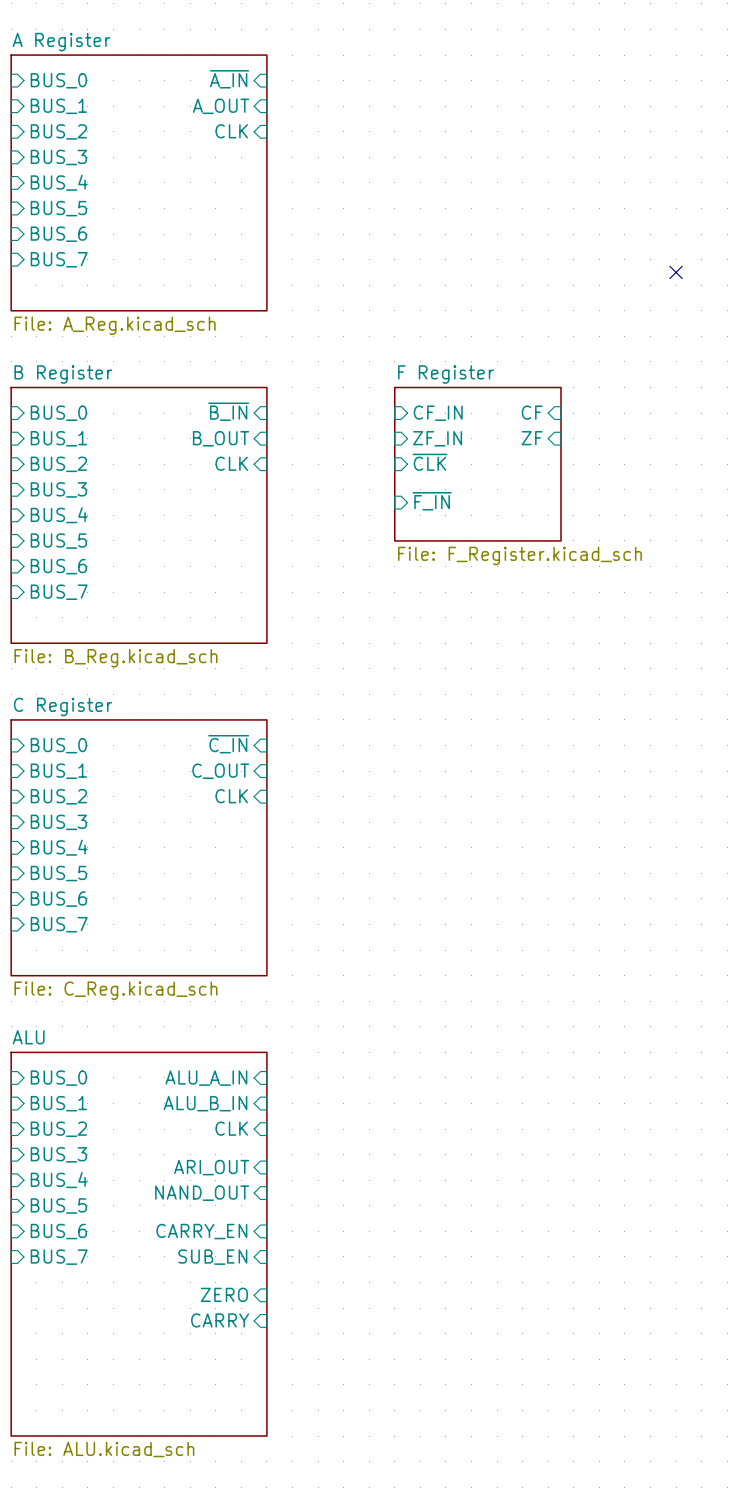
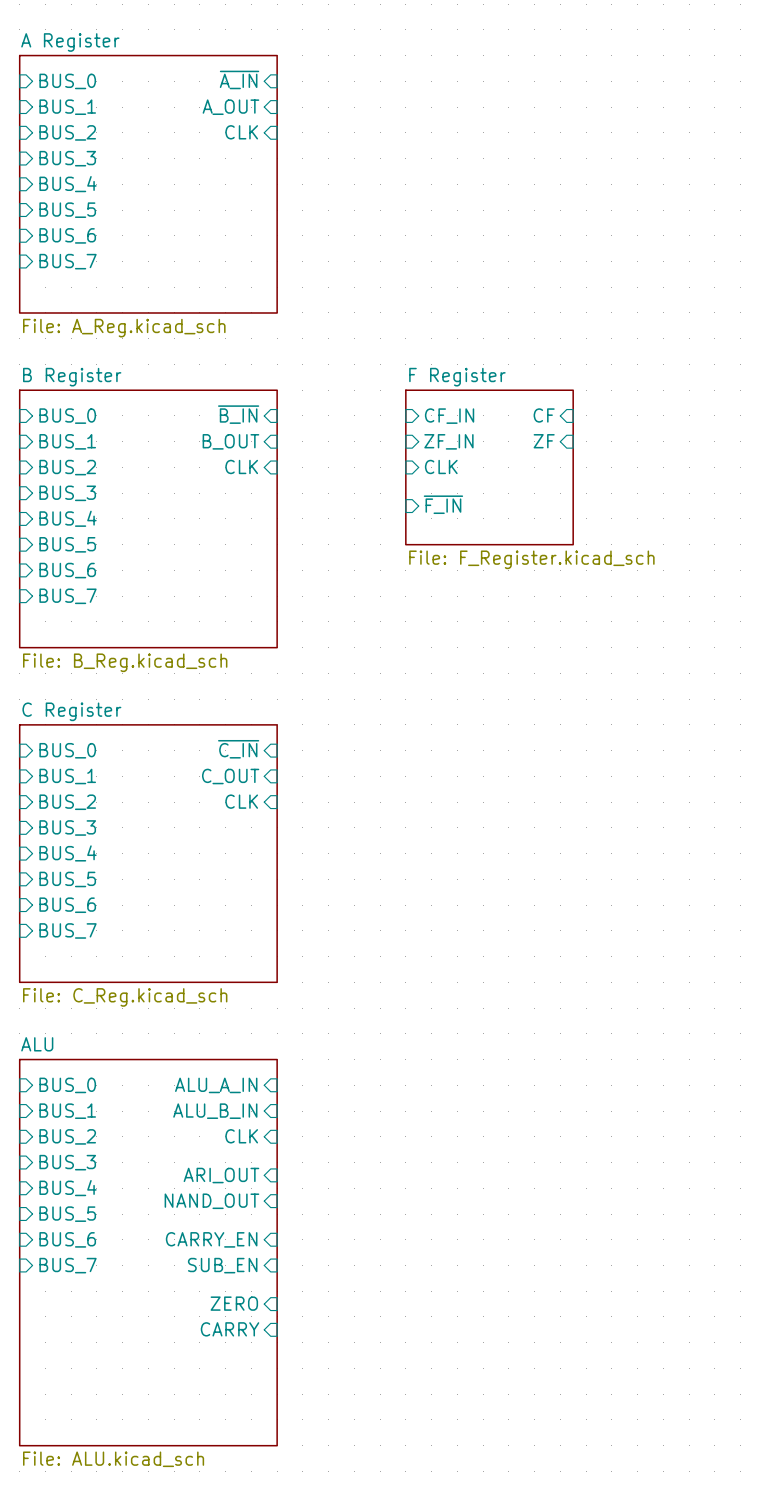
no-connect mark: (676, 272) -> none
sheet pin: ~{CLK} (429, 462) -> CLK (441, 466)

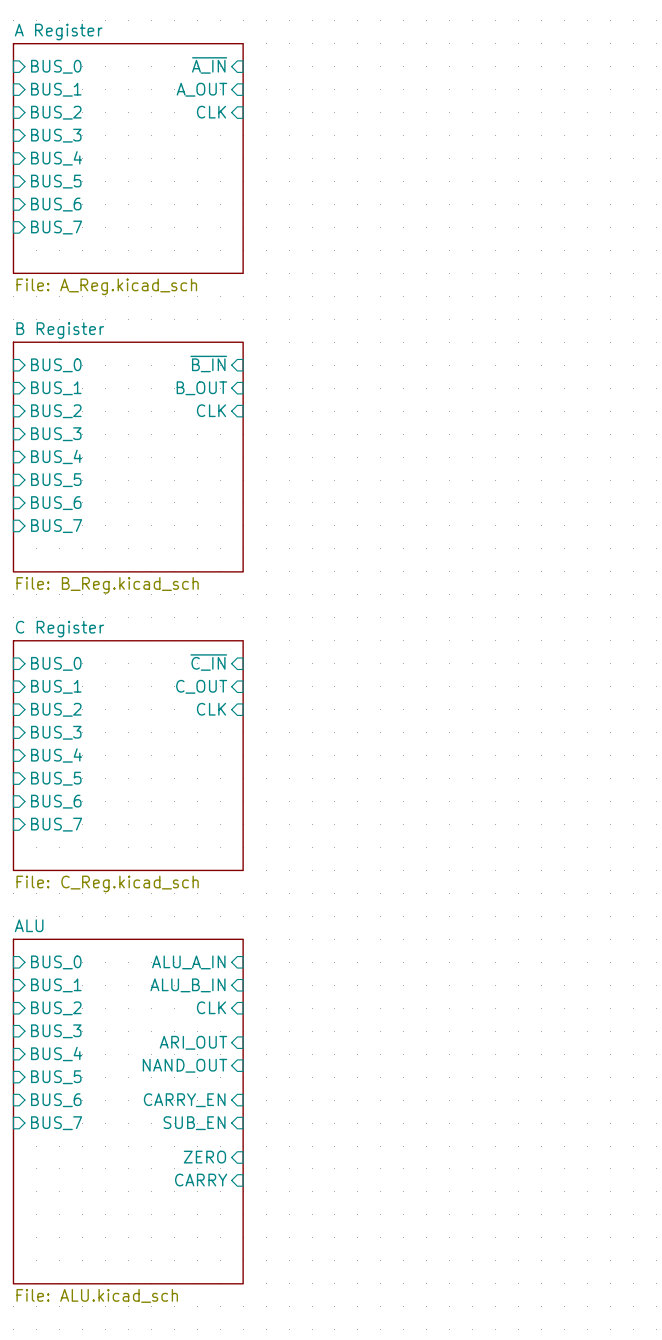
sheet pin: CF (544, 415) -> none
sheet pin: CF_IN (449, 416) -> none
sheet pin: ZF_IN (448, 441) -> none
sheet pin: ZF (544, 441) -> none
sheet pin: CLK (441, 466) -> none
sheet F Register: File: F_Register.kicad_sch (489, 467) -> none
sheet pin: ~{F_IN} (443, 504) -> none

